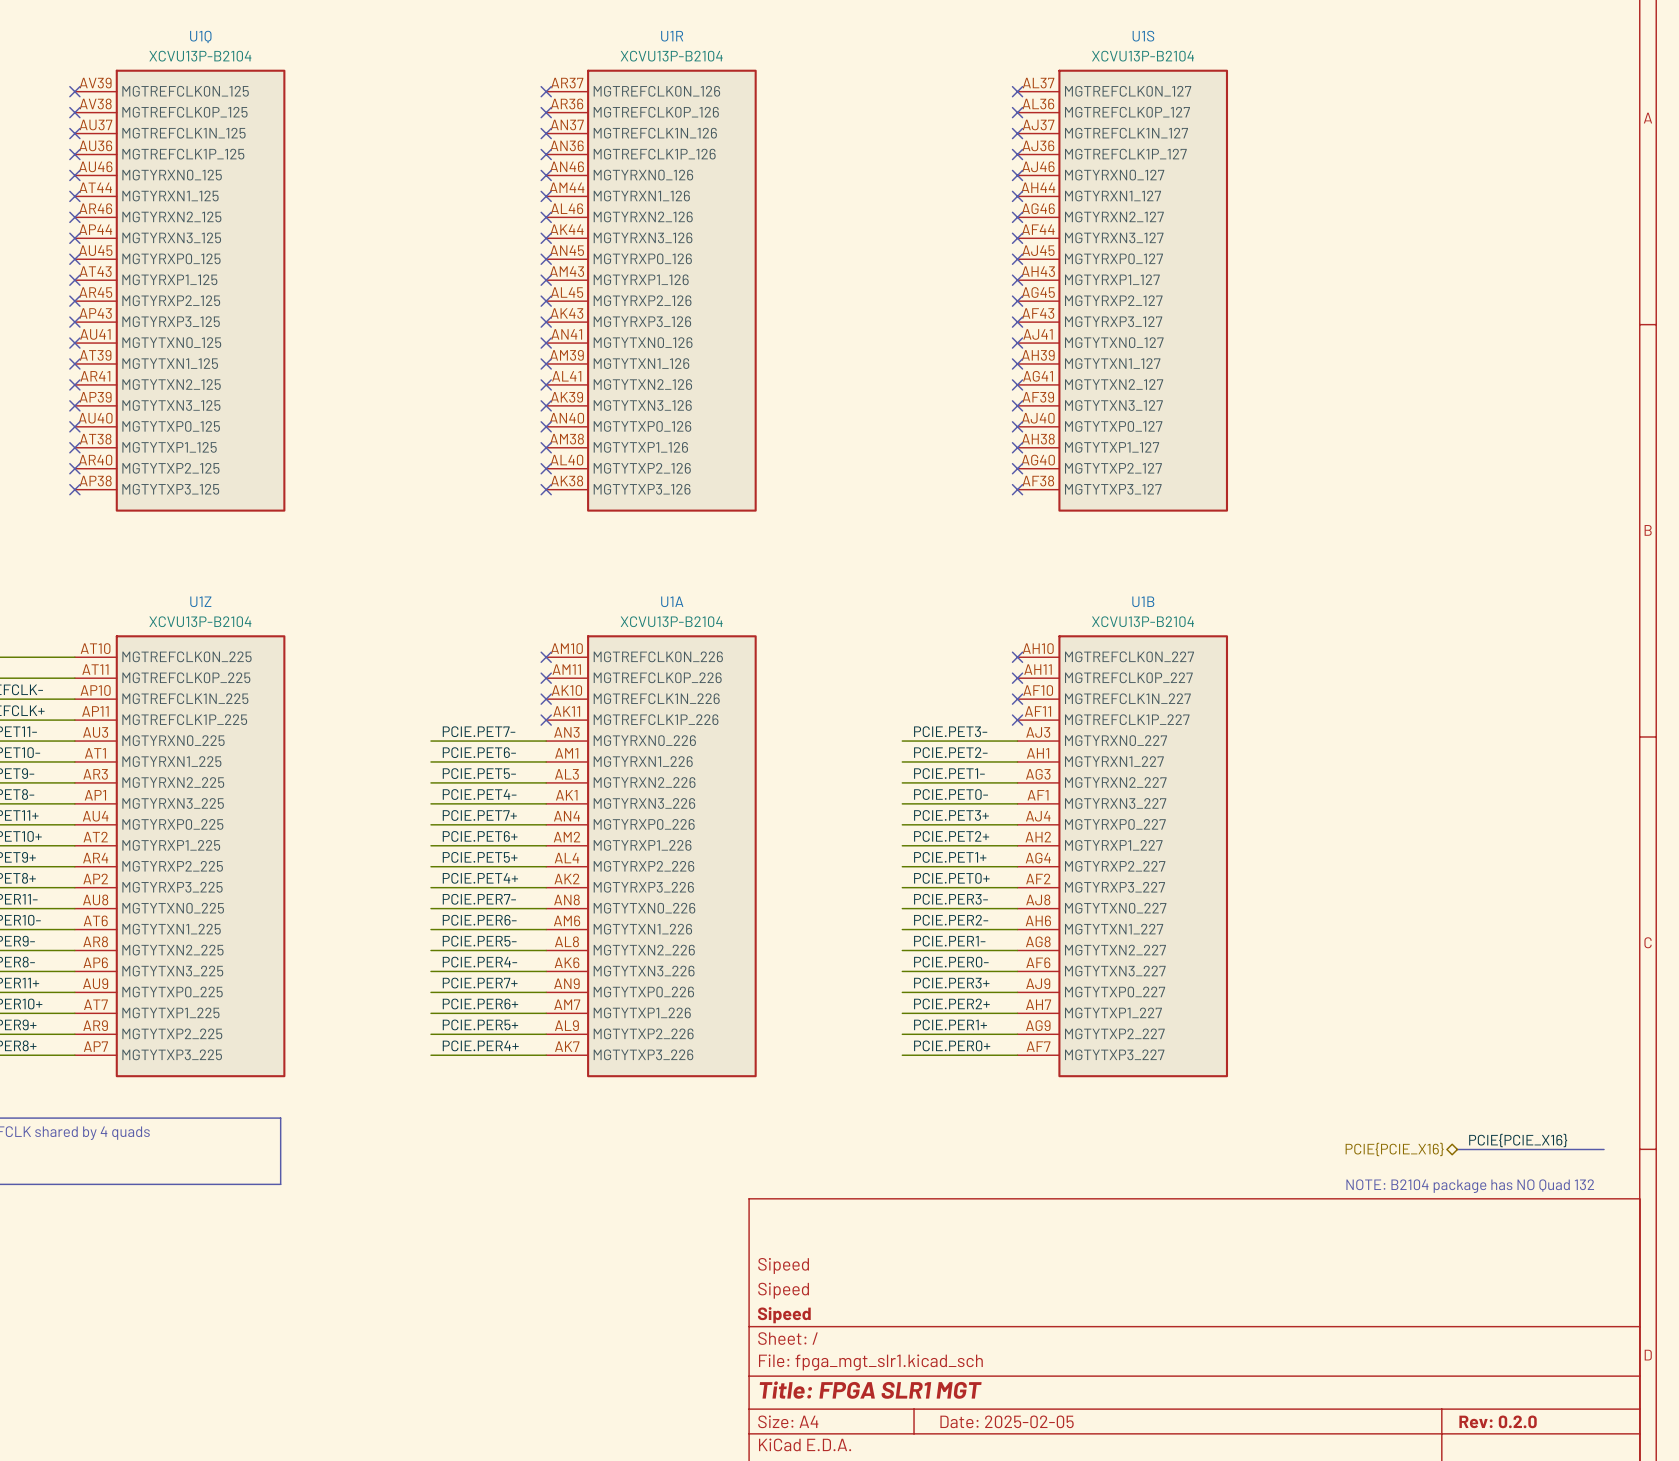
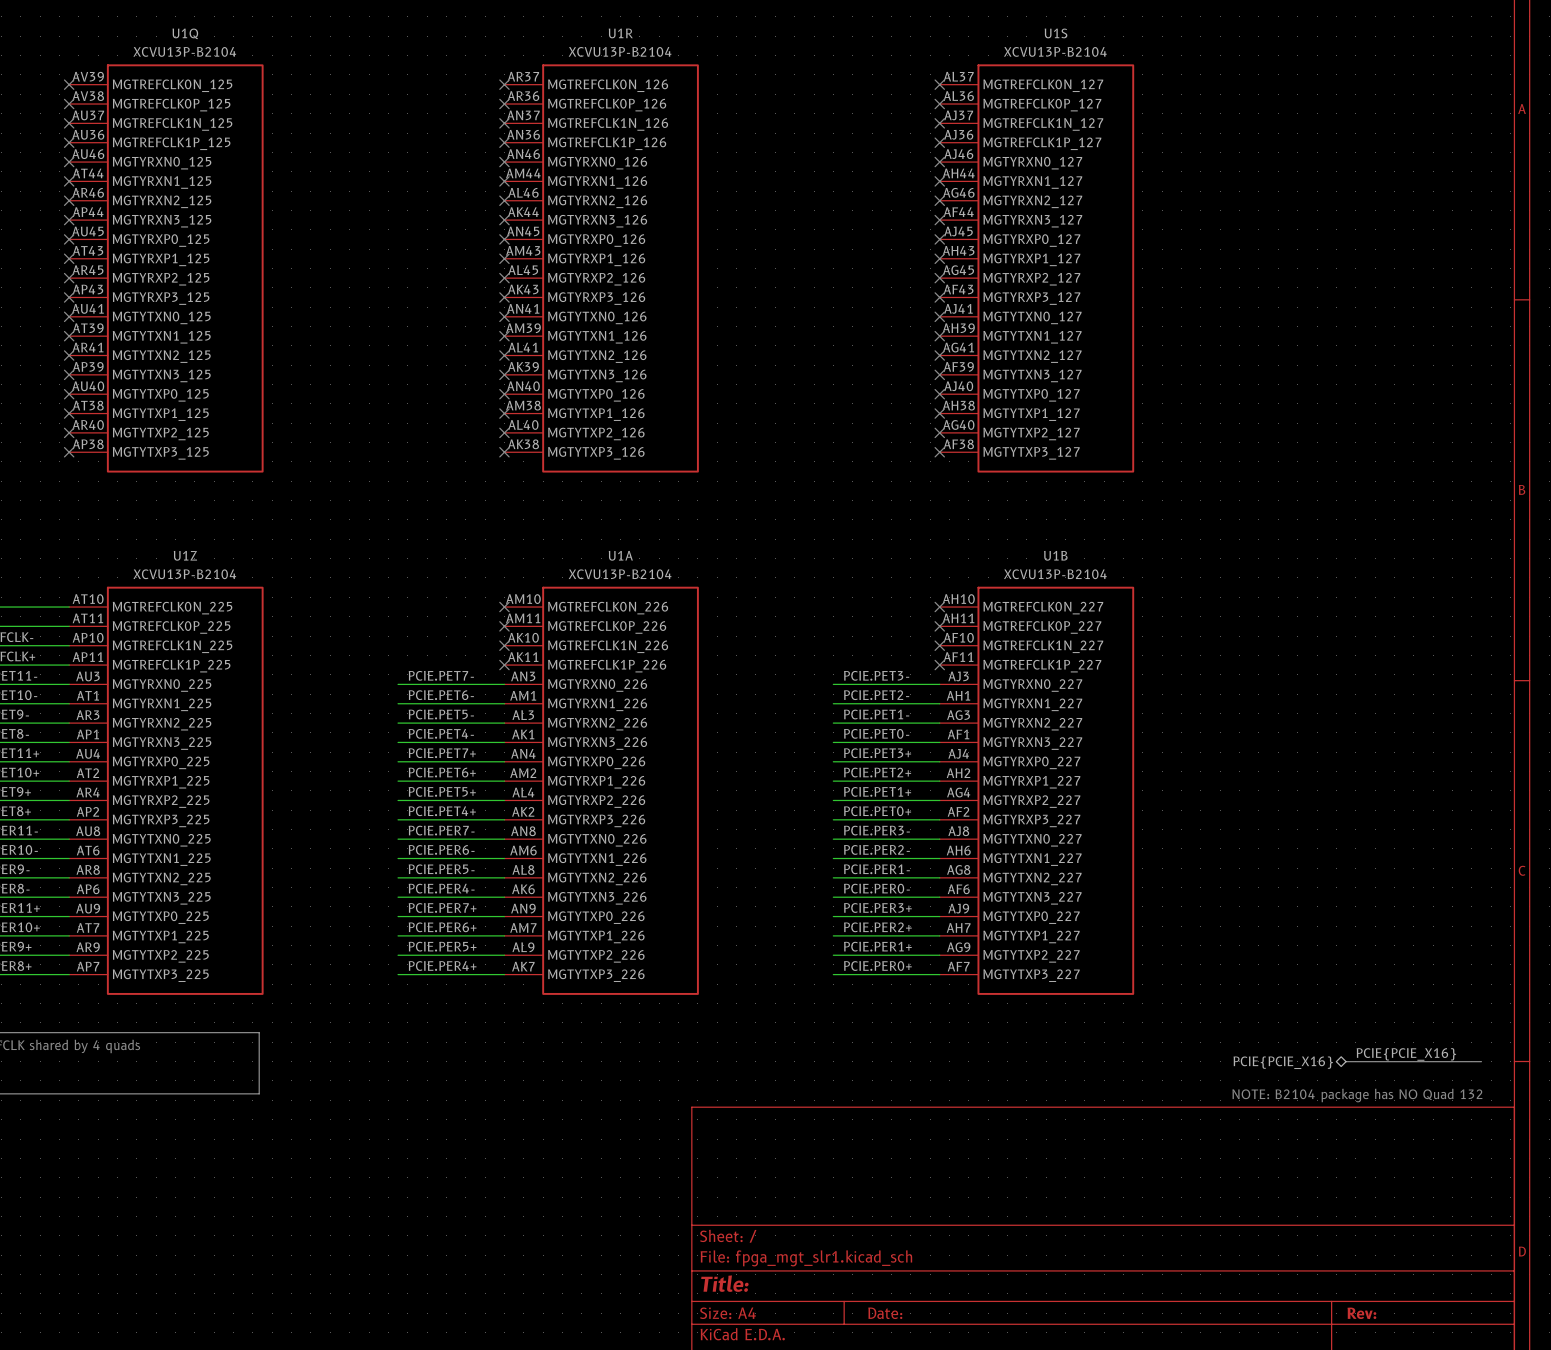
title block: Sipeed (783, 1265) -> none
title block: Sipeed (783, 1290) -> none
title block: Sipeed (784, 1315) -> none
title block: Title: FPGA SLR1 MGT (870, 1390) -> Title: (724, 1283)
title block: Date: 2025-02-05 (1007, 1421) -> Date: (885, 1313)
title block: Rev: 0.2.0 (1498, 1421) -> Rev: (1361, 1313)

